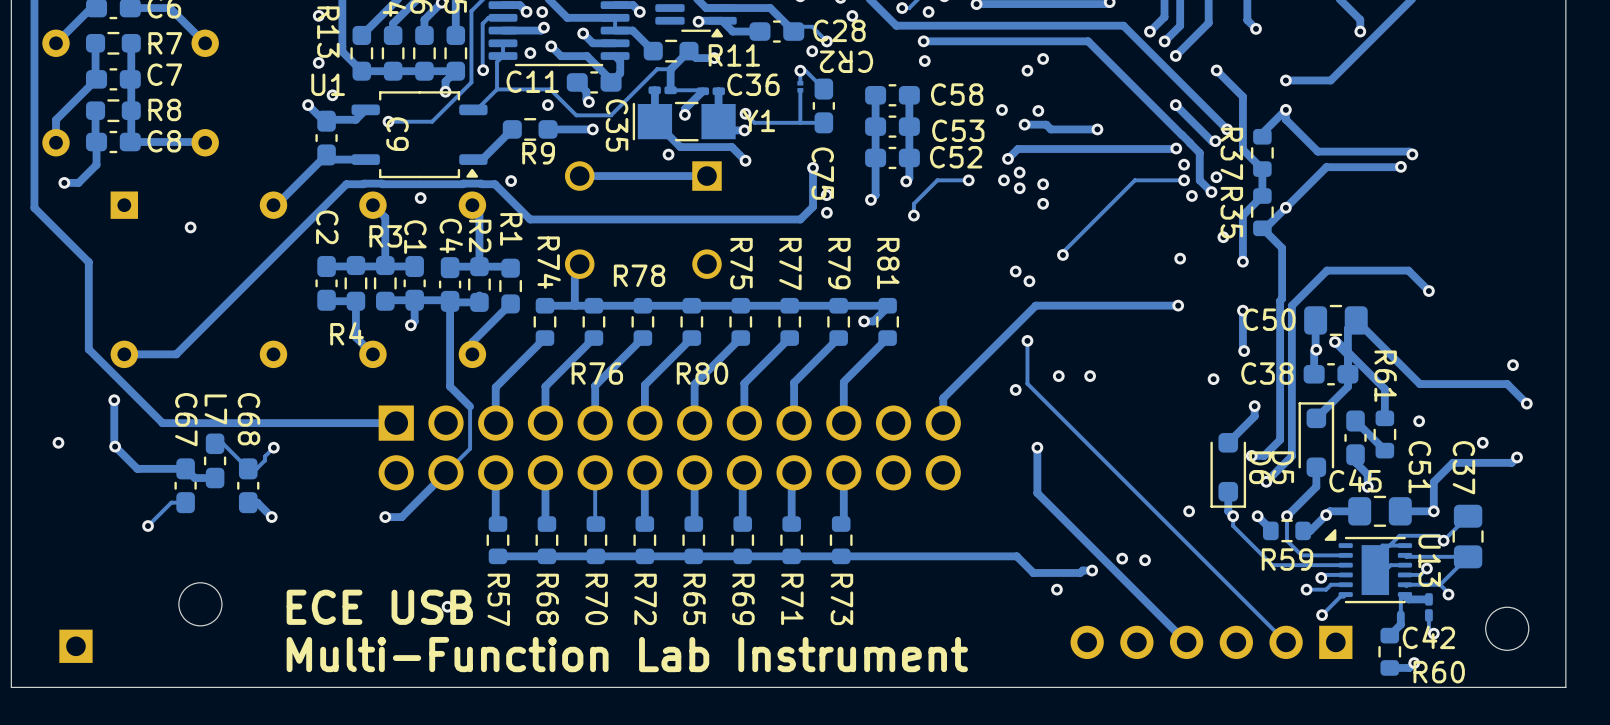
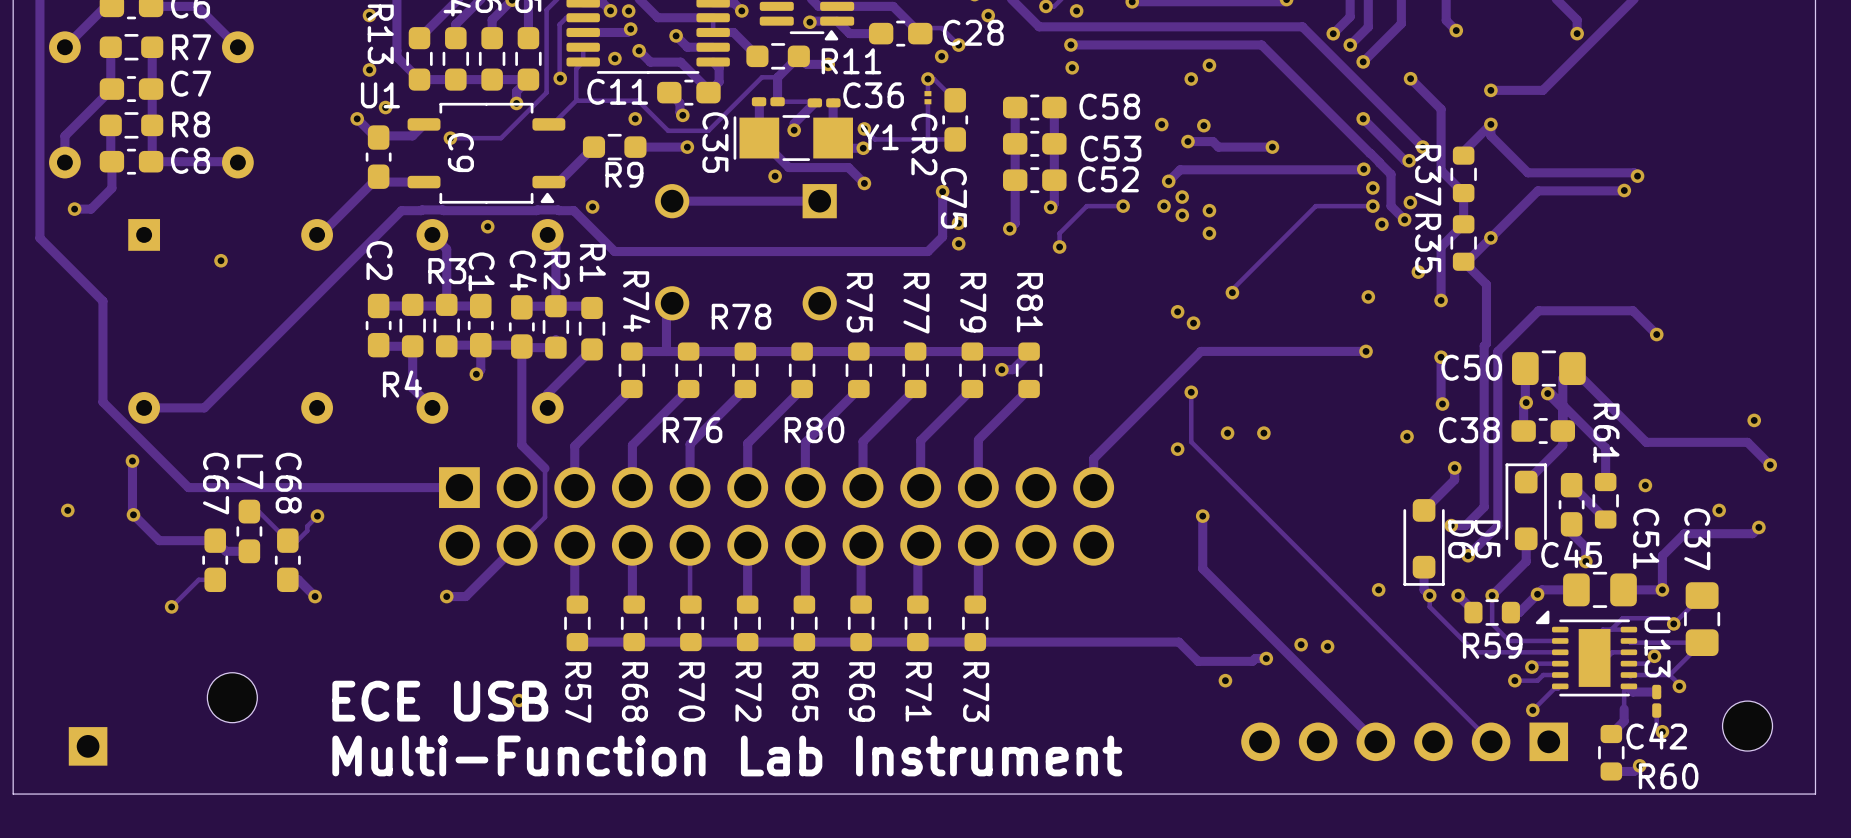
CR2 name rotation: 0° (846, 61) -> 90° counterclockwise (924, 144)
CR2 name position: CR2 (846, 61) -> CR2 (924, 144)

